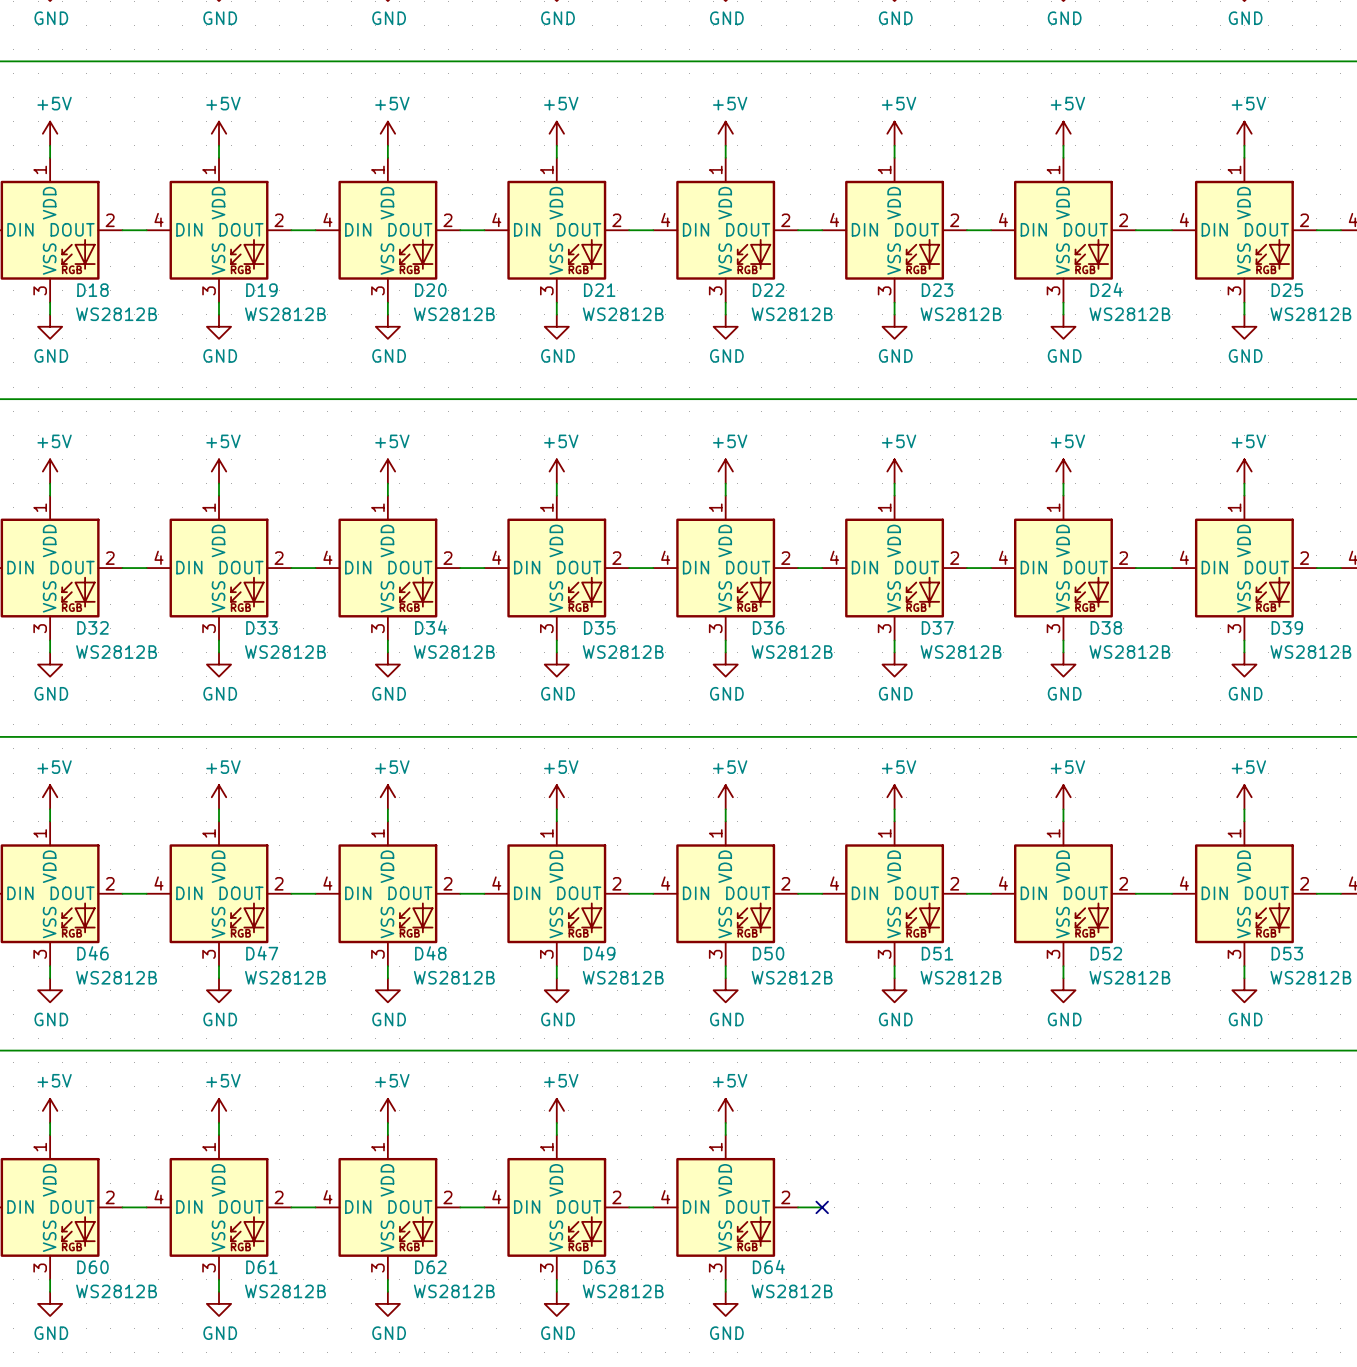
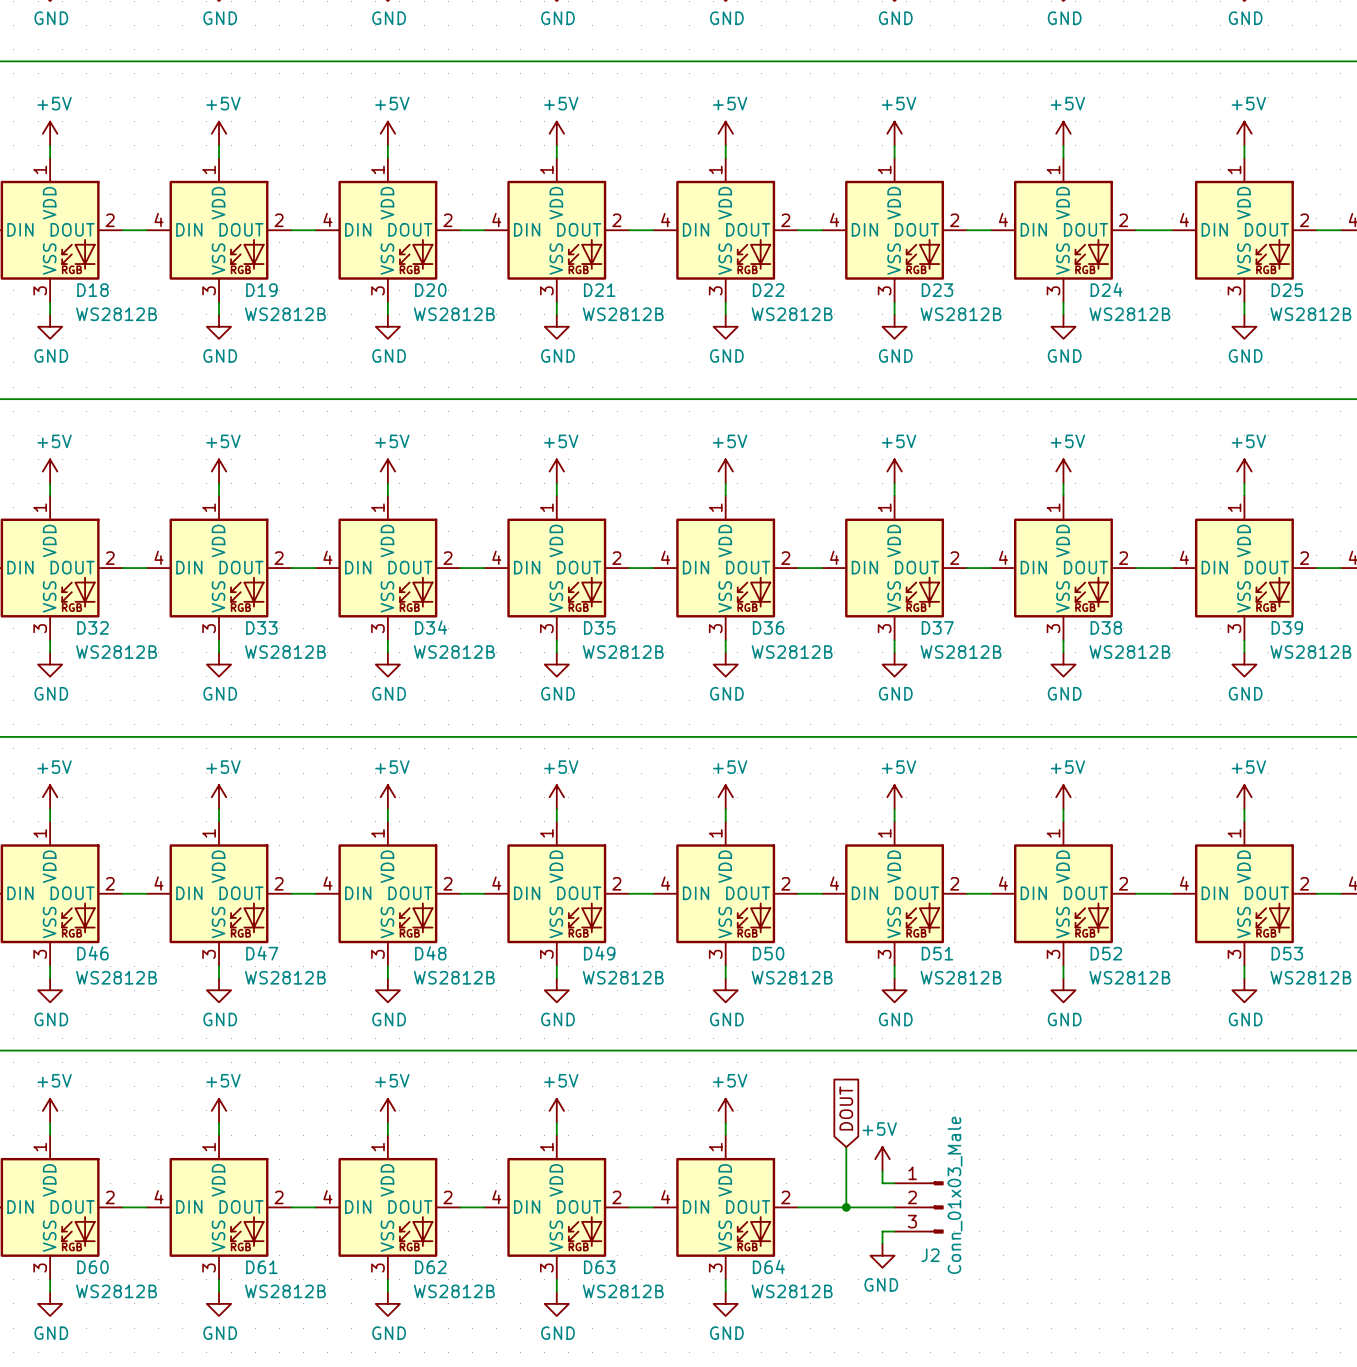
global label: none -> DOUT (846, 1108)
wire: none -> (846, 1147) (846, 1207)
power symbol: none -> +5V (882, 1159)
wire: none -> (882, 1171) (882, 1183) (894, 1183)
wire: none -> (822, 1207) (894, 1207)
no-connect mark: (822, 1207) -> none
junction: none -> (846, 1207)
J2: none -> Conn_01x03_Male (919, 1207)
wire: none -> (894, 1231) (882, 1231) (882, 1243)
power symbol: none -> GND (882, 1255)

